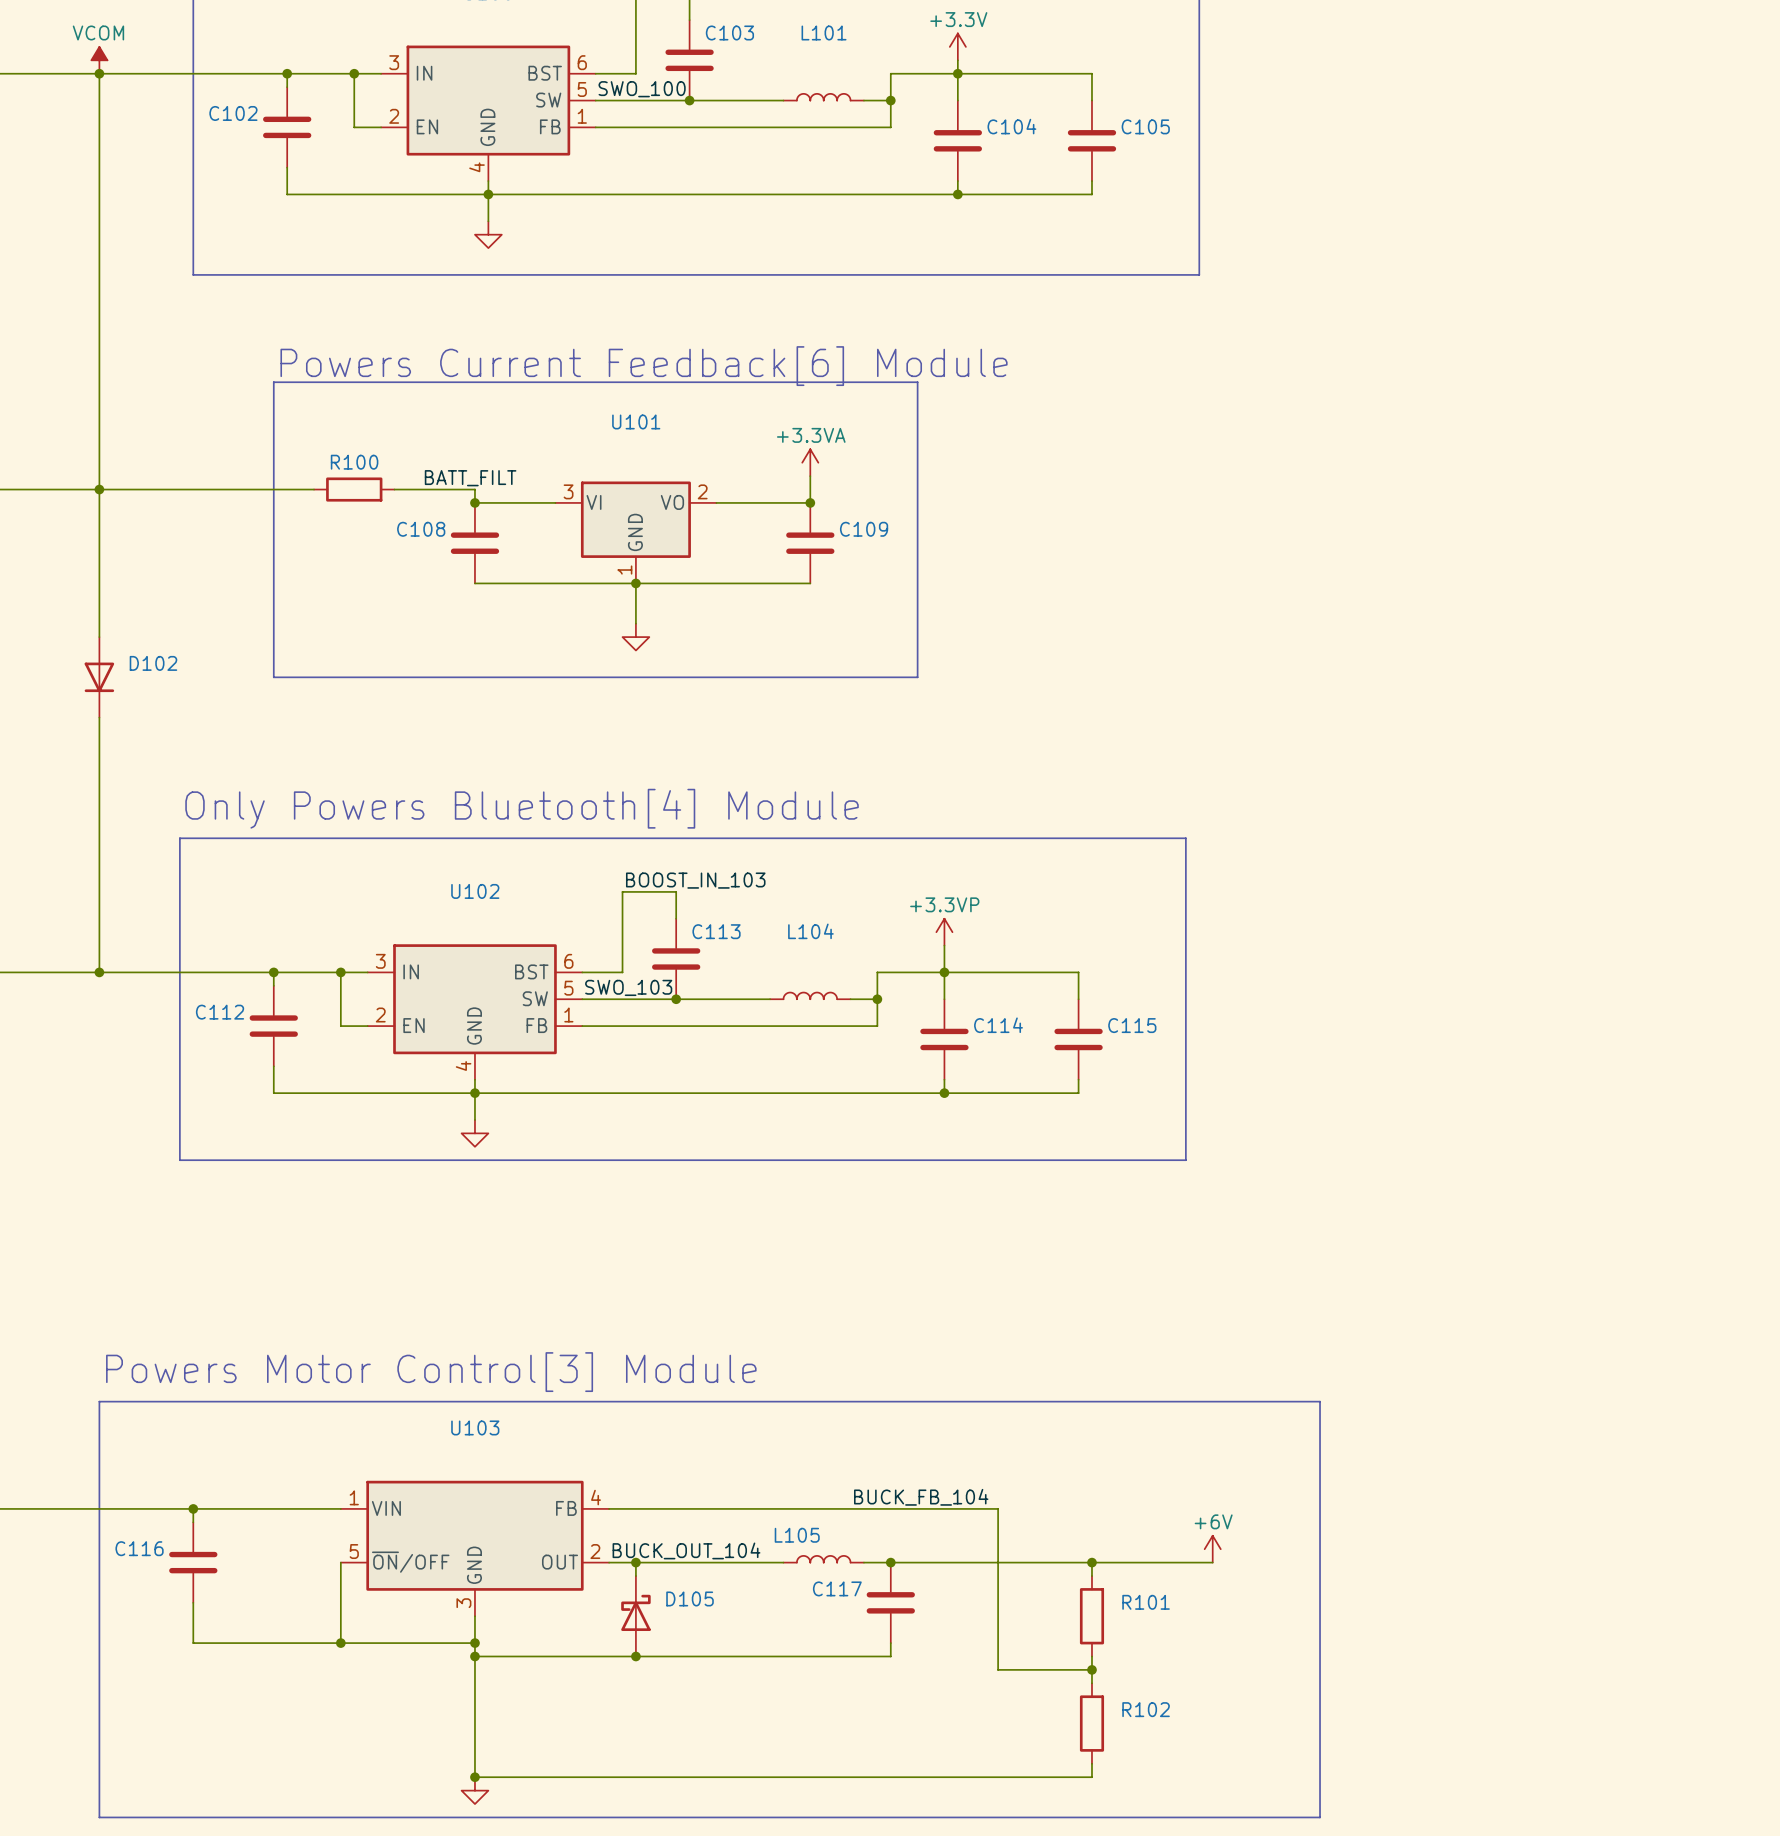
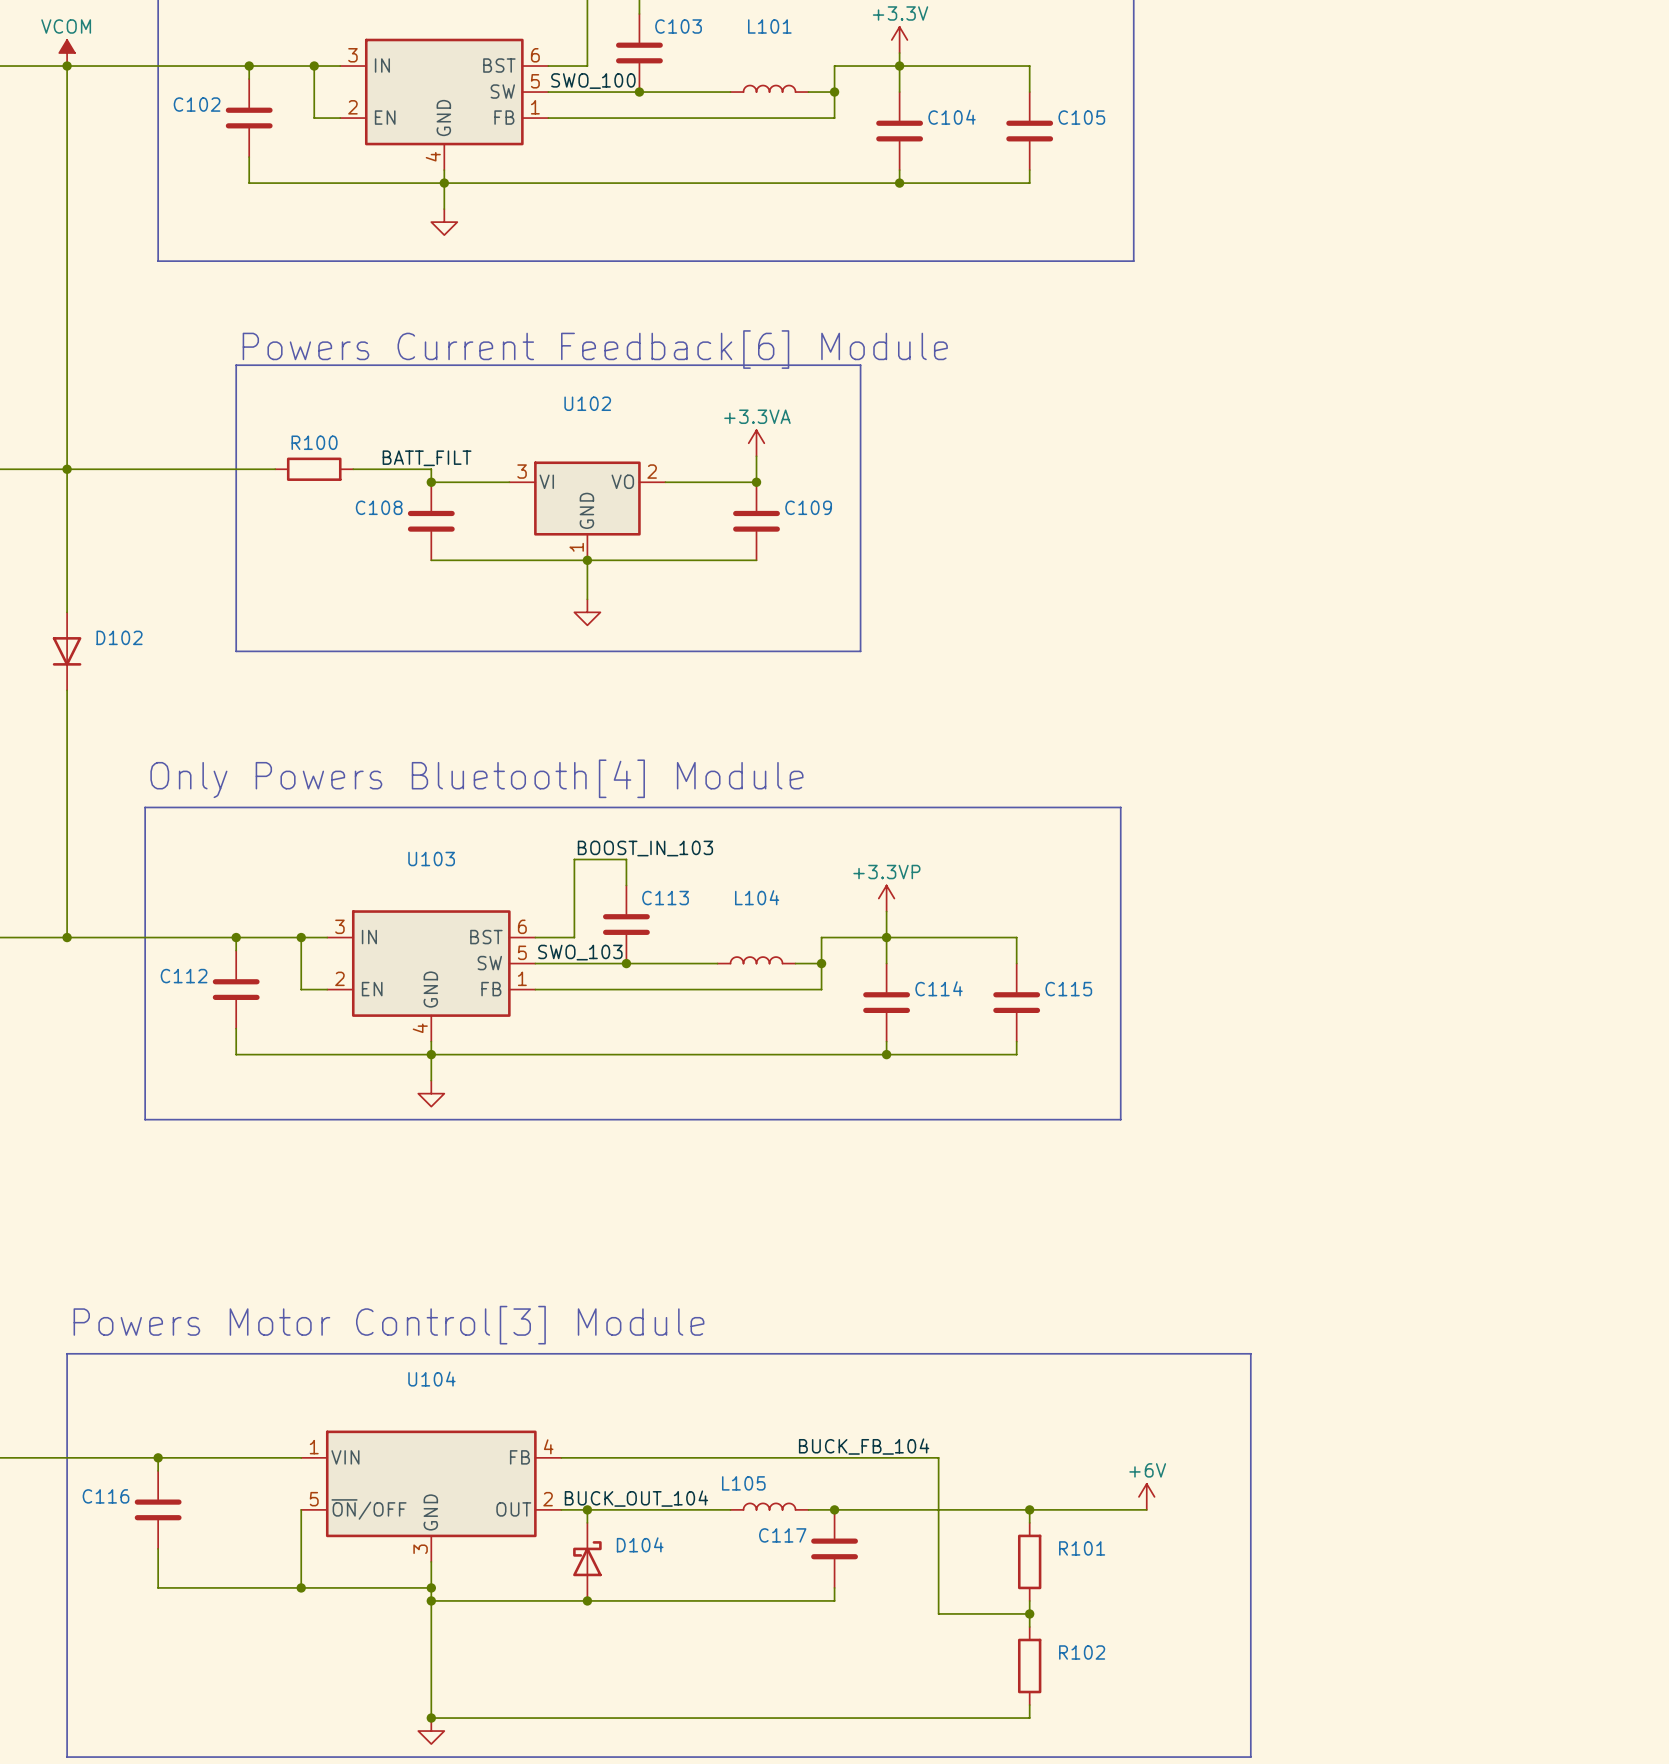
U101 name: U101 (636, 421) -> U102 (587, 403)
U102 name: U102 (475, 891) -> U103 (431, 859)
U103 name: U103 (475, 1427) -> U104 (431, 1379)
D105 name: D105 (690, 1598) -> D104 (640, 1544)

